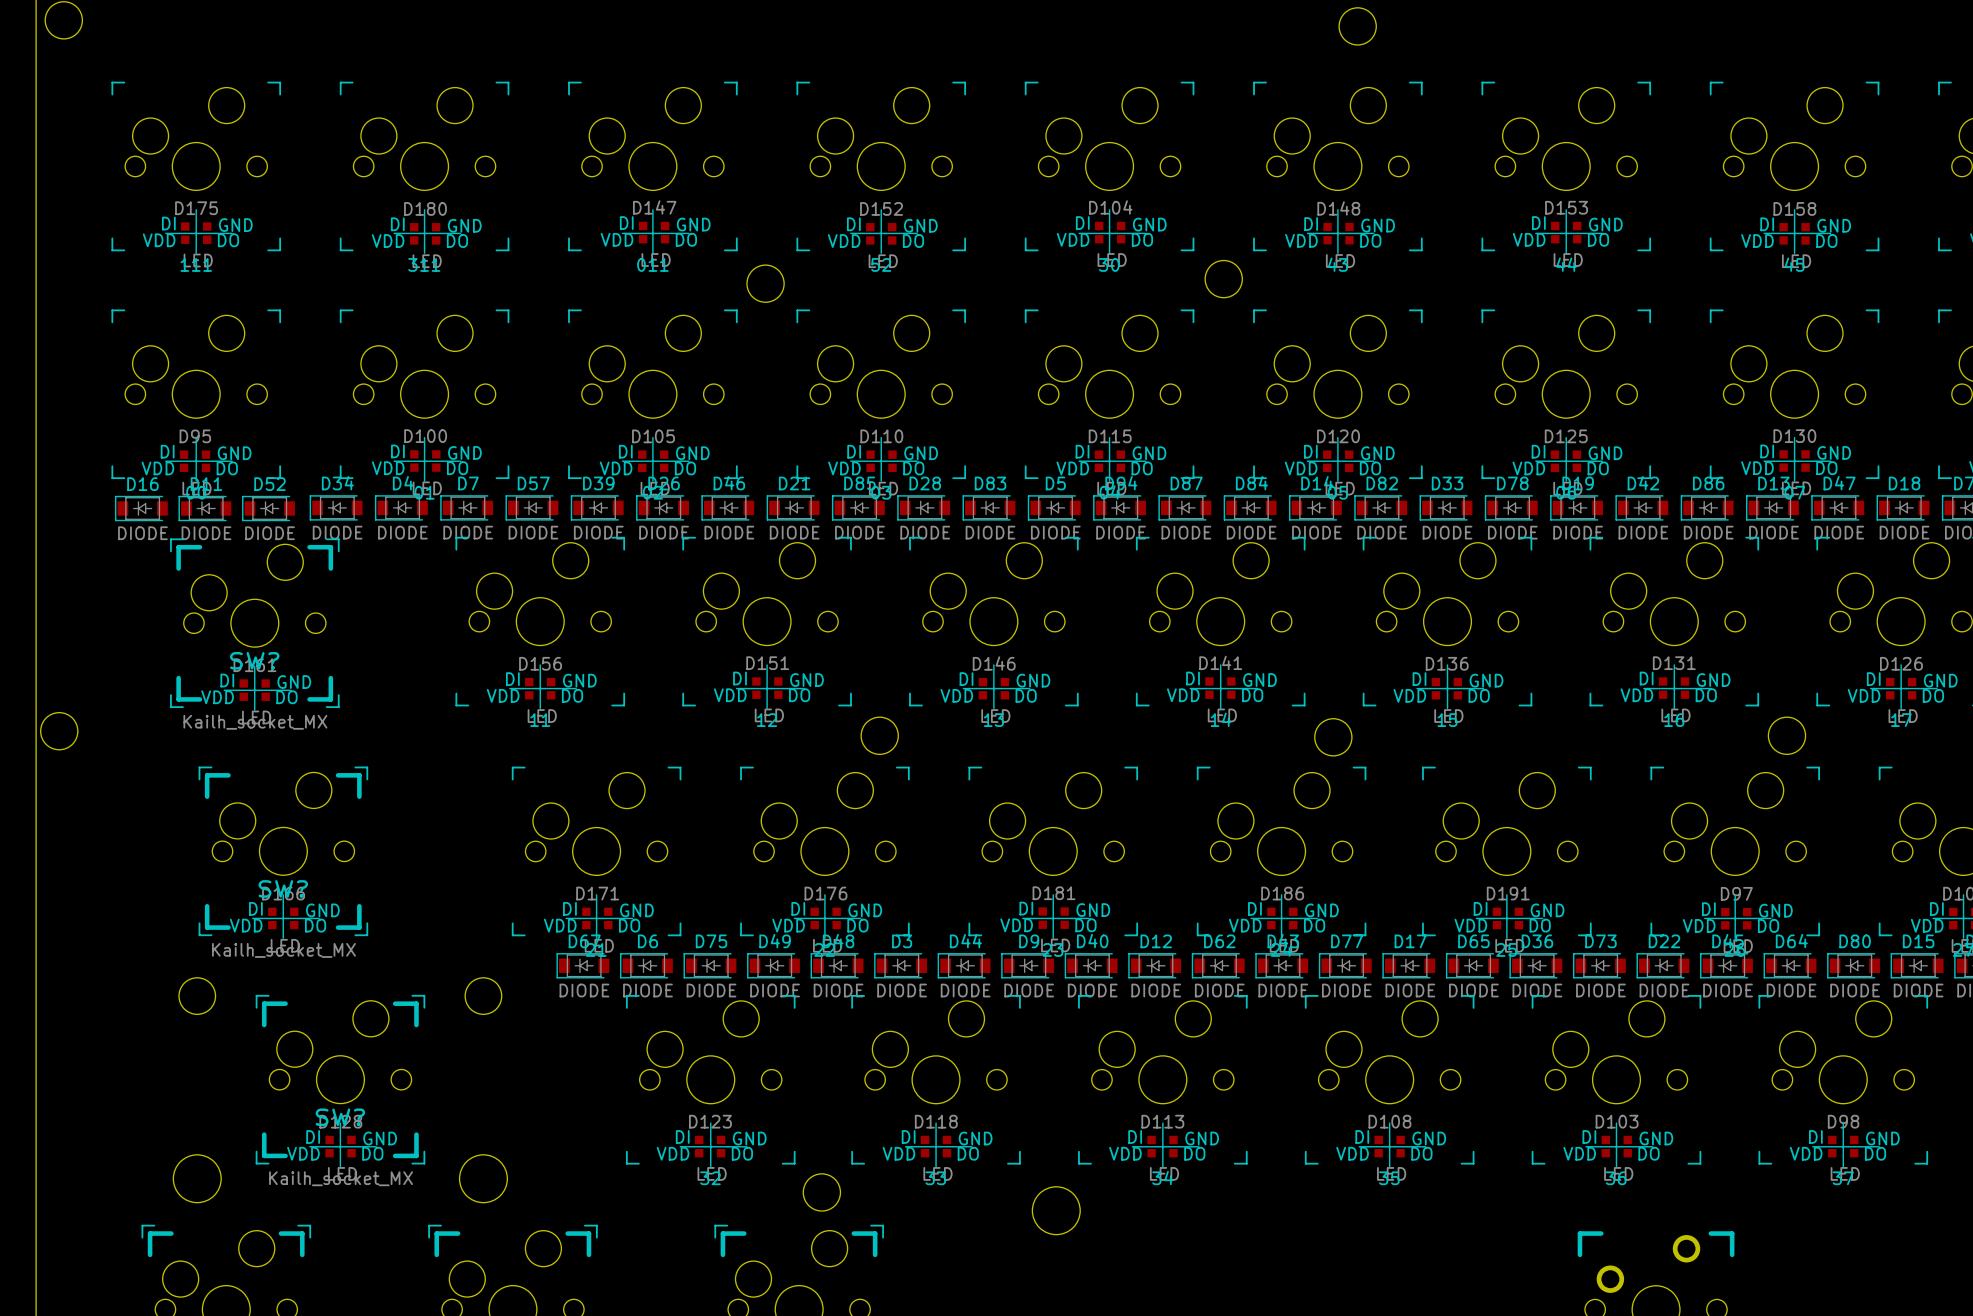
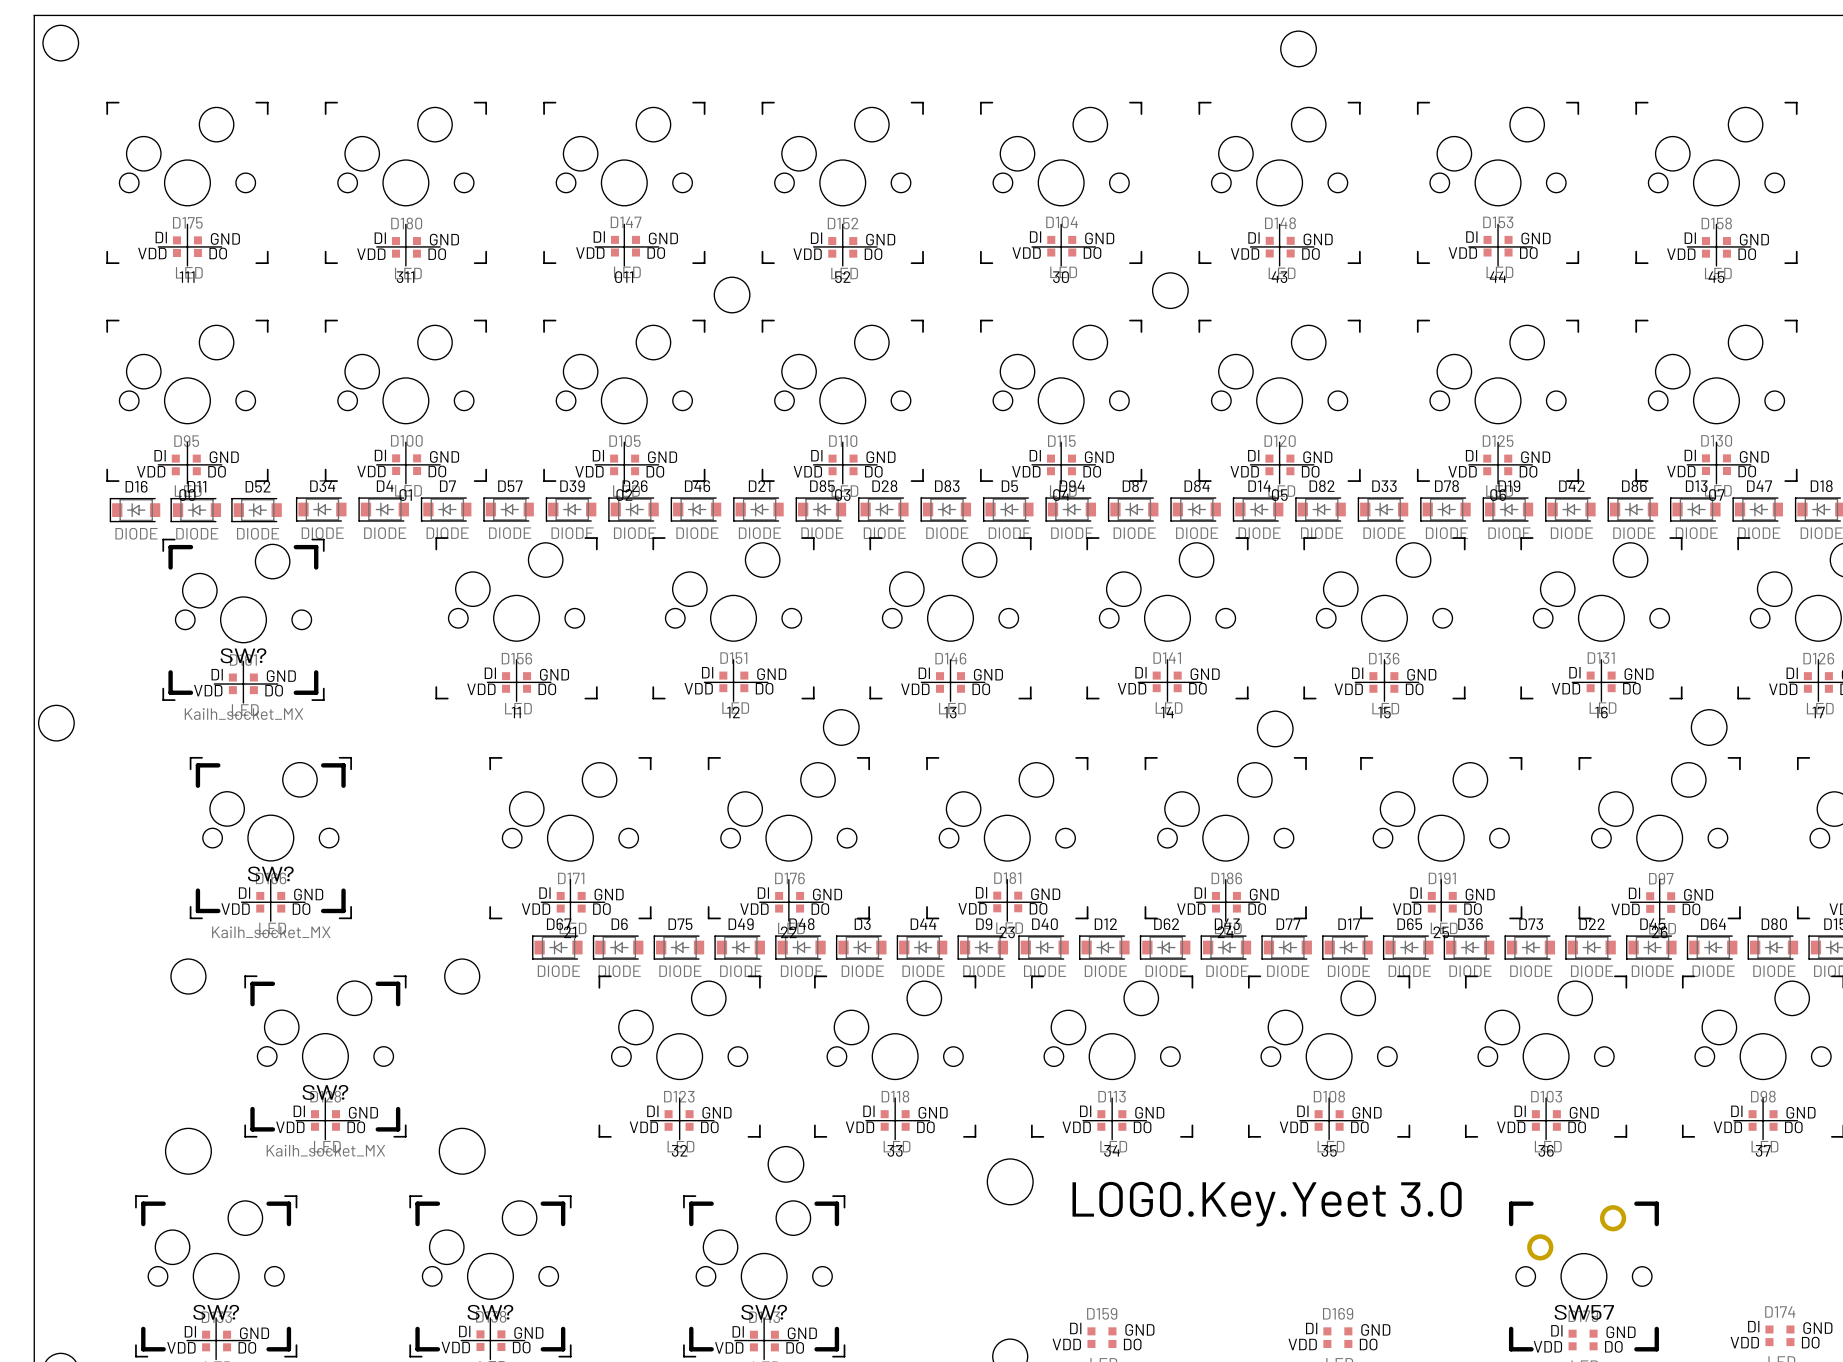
text: none -> LOG0.Key.Yeet 3.0 (1267, 1204)

